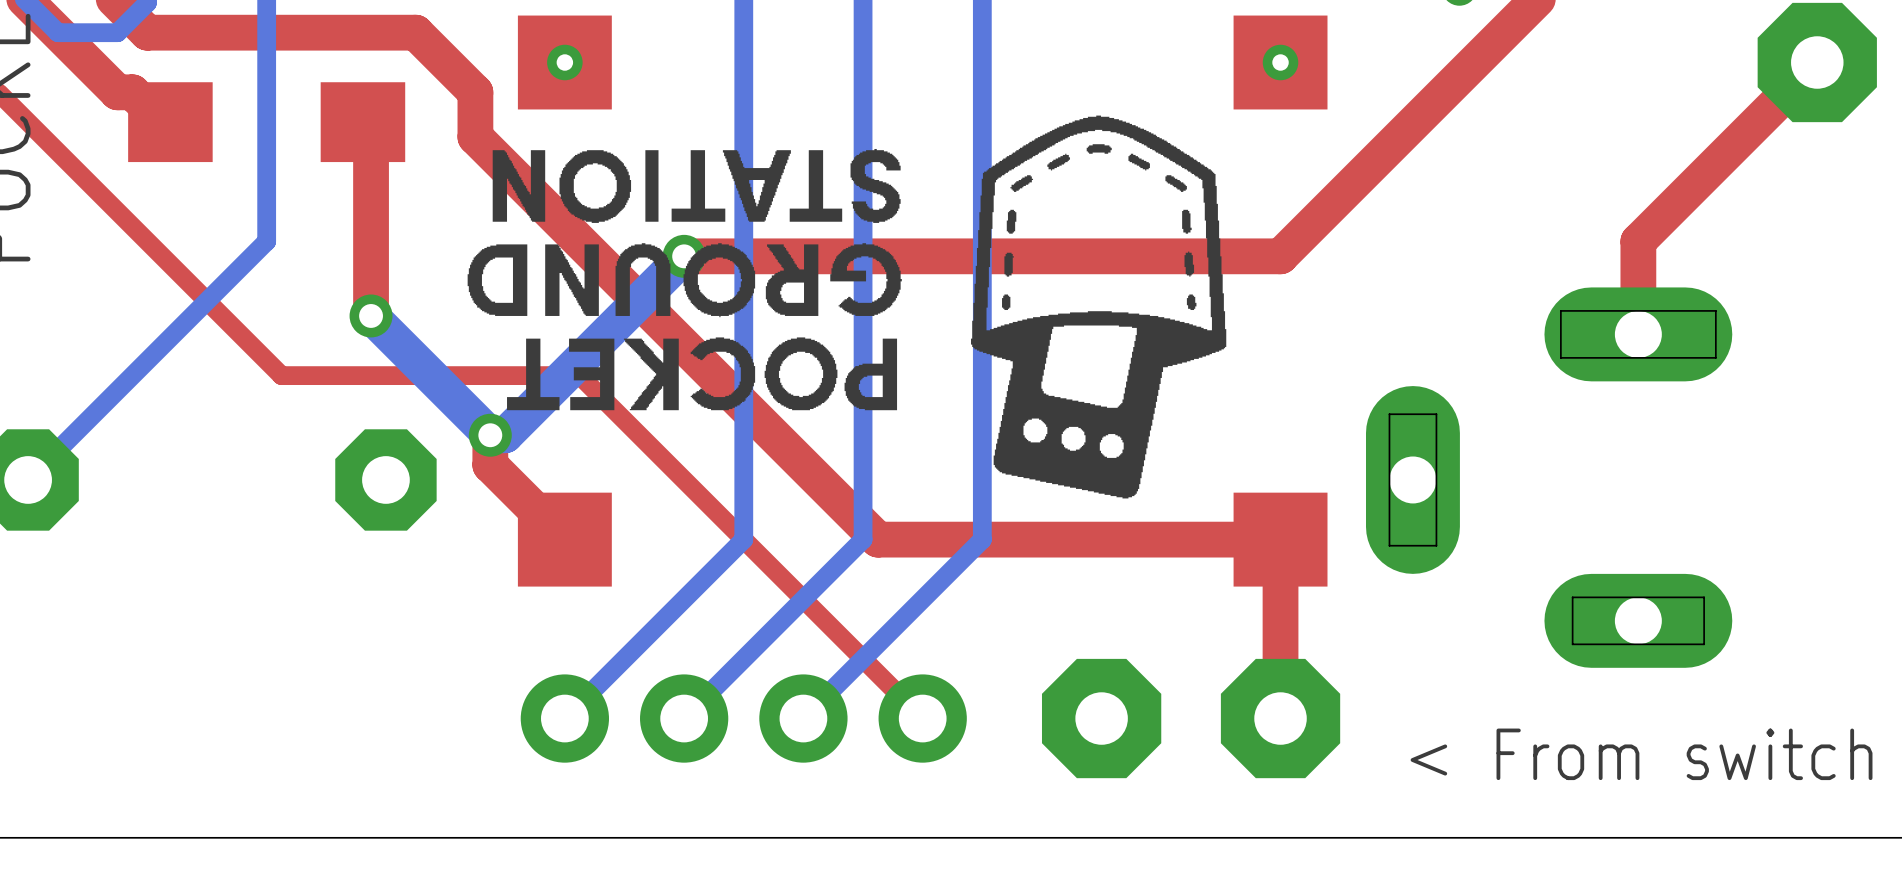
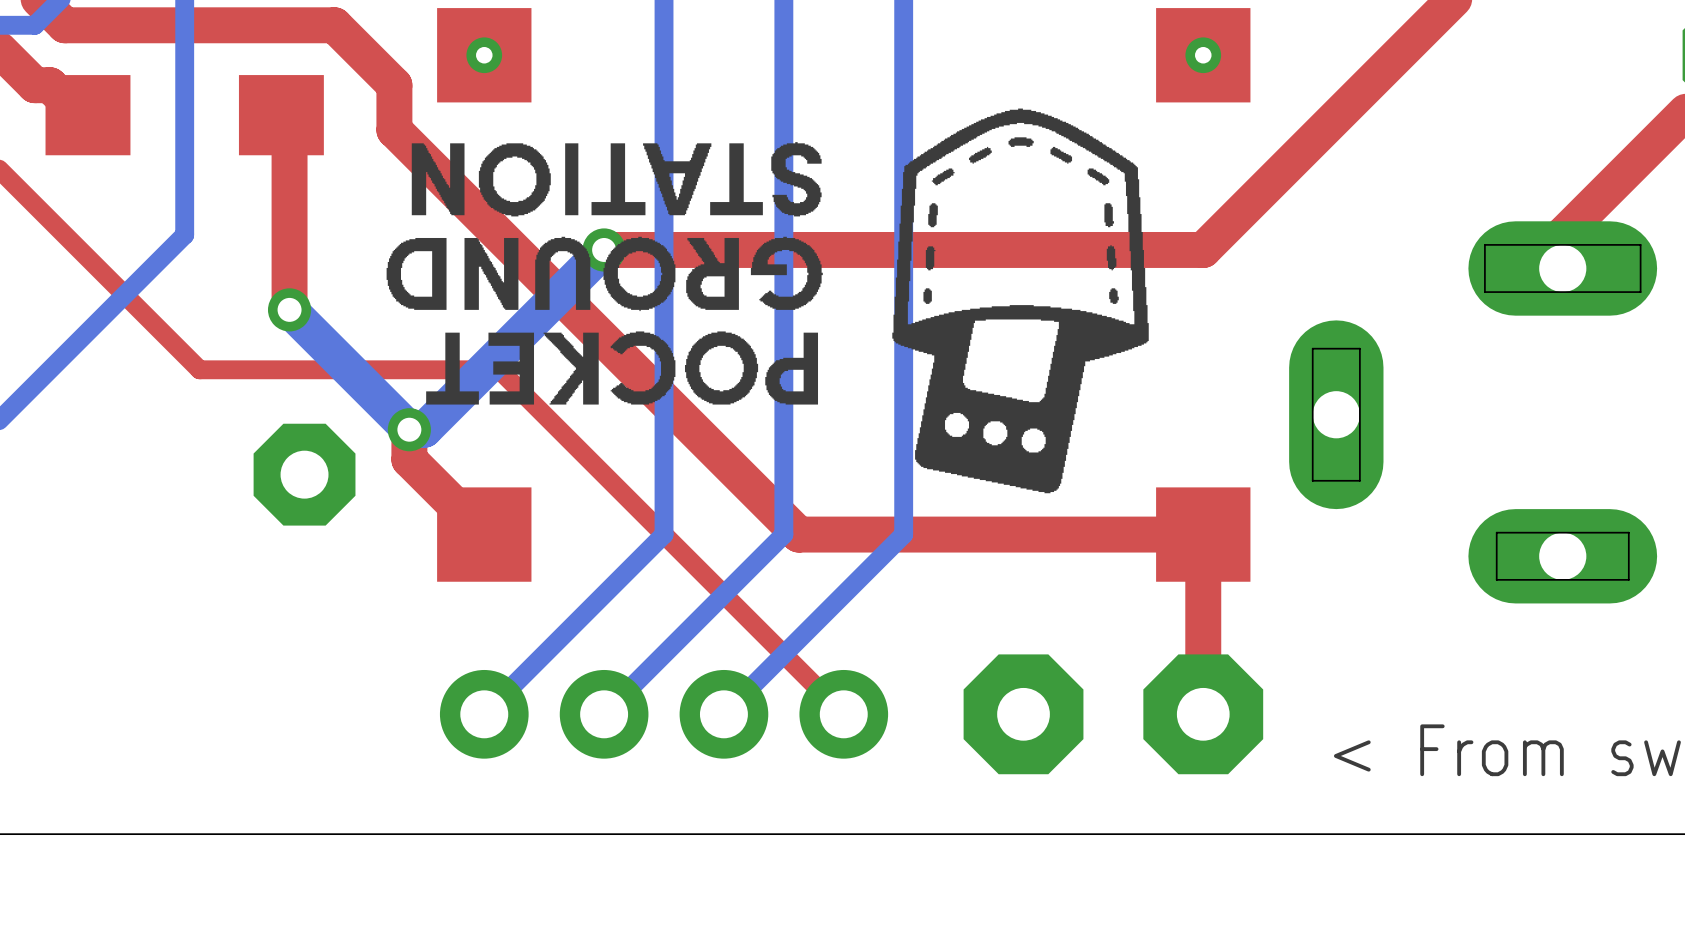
part position: (1549, 477) -> (1473, 412)

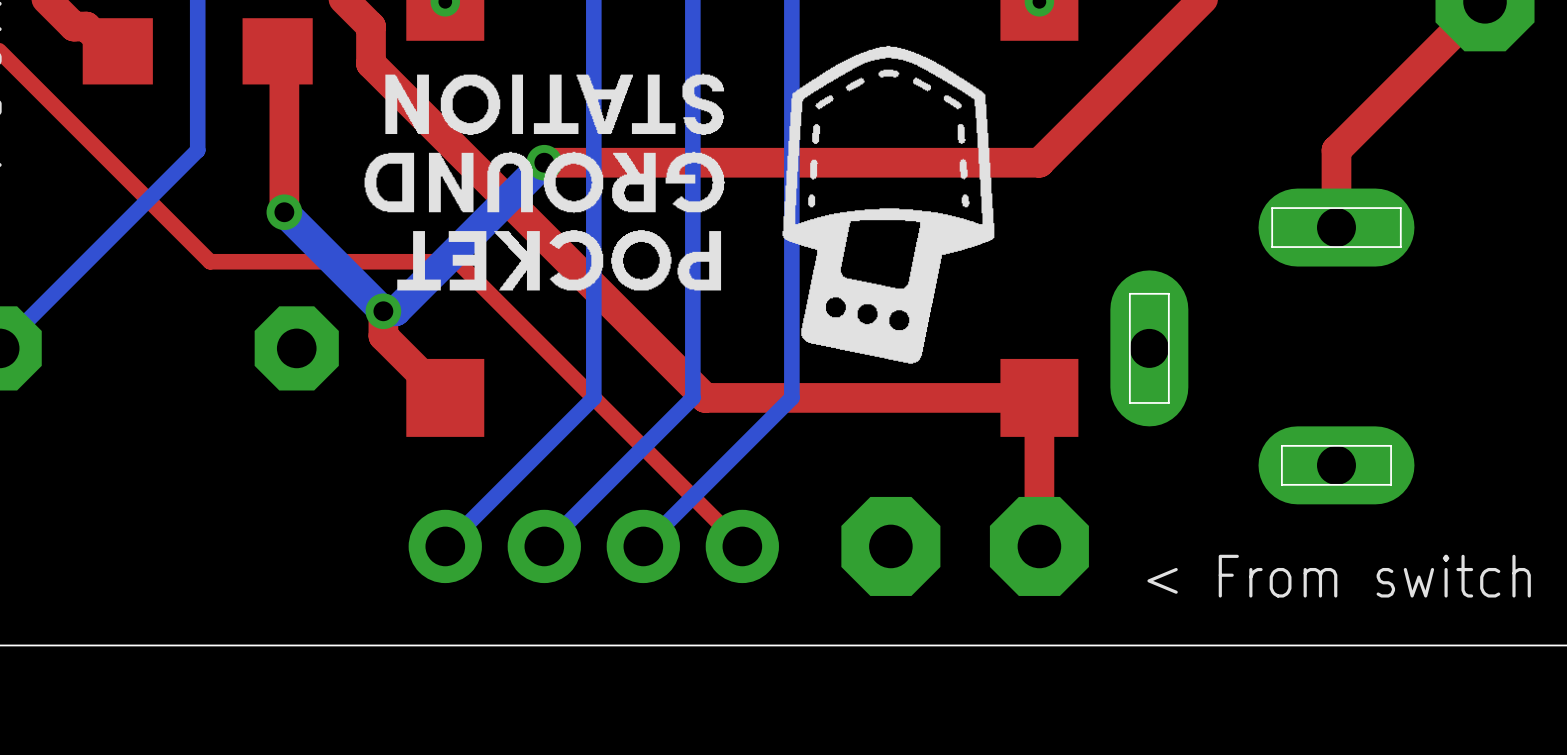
part position: (1473, 412) -> (1262, 346)

